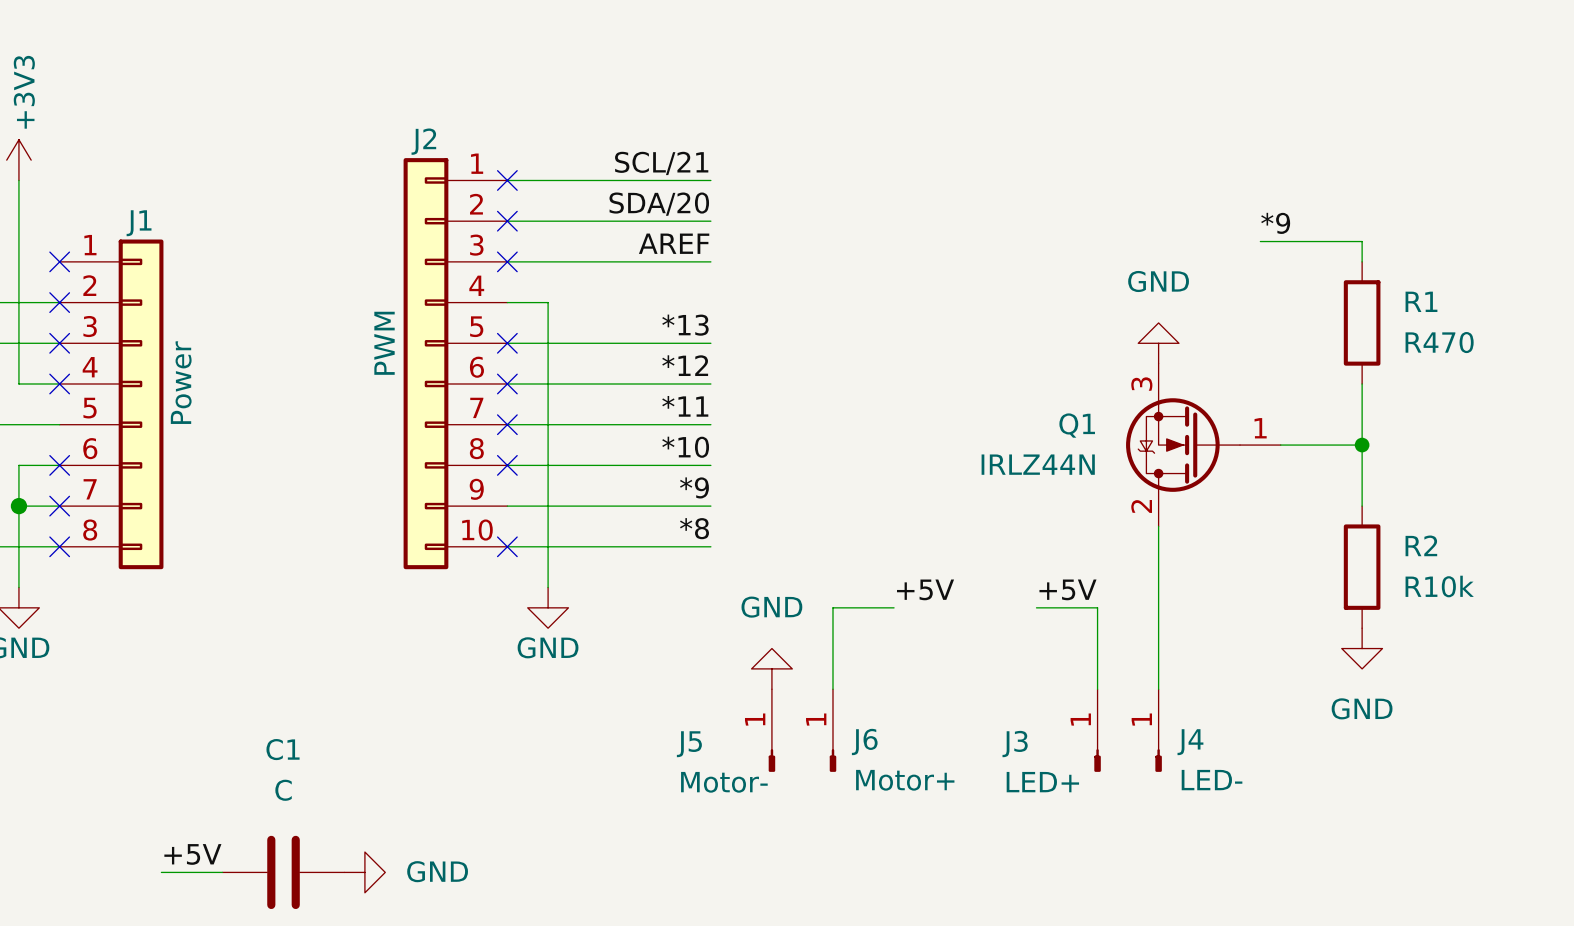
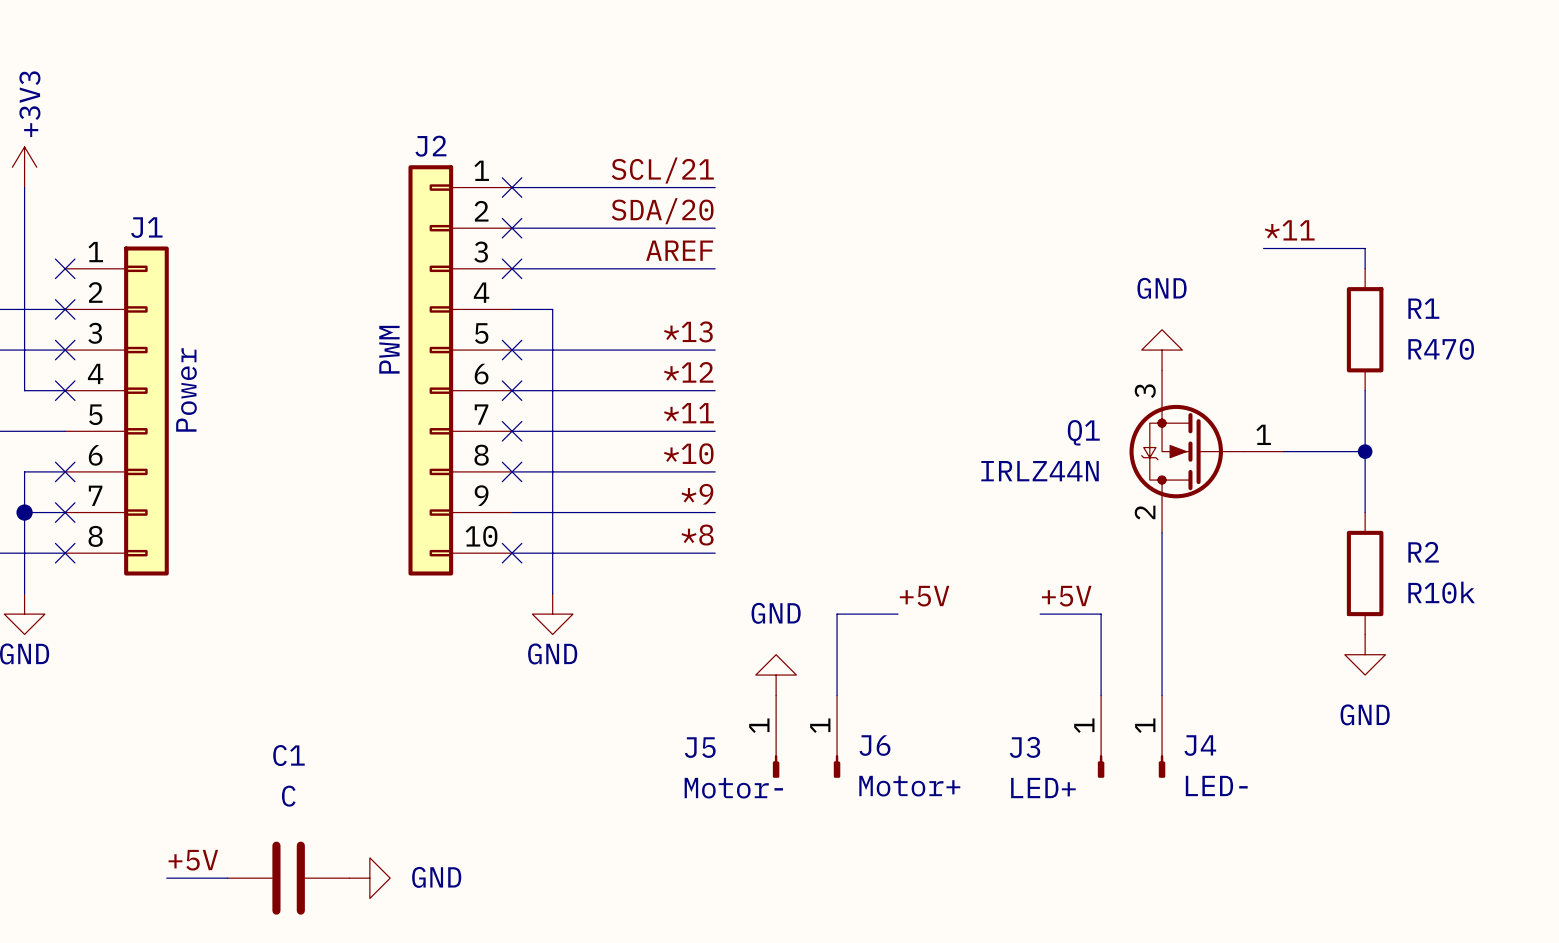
label: *9 (1275, 223) -> *11 (1289, 230)

